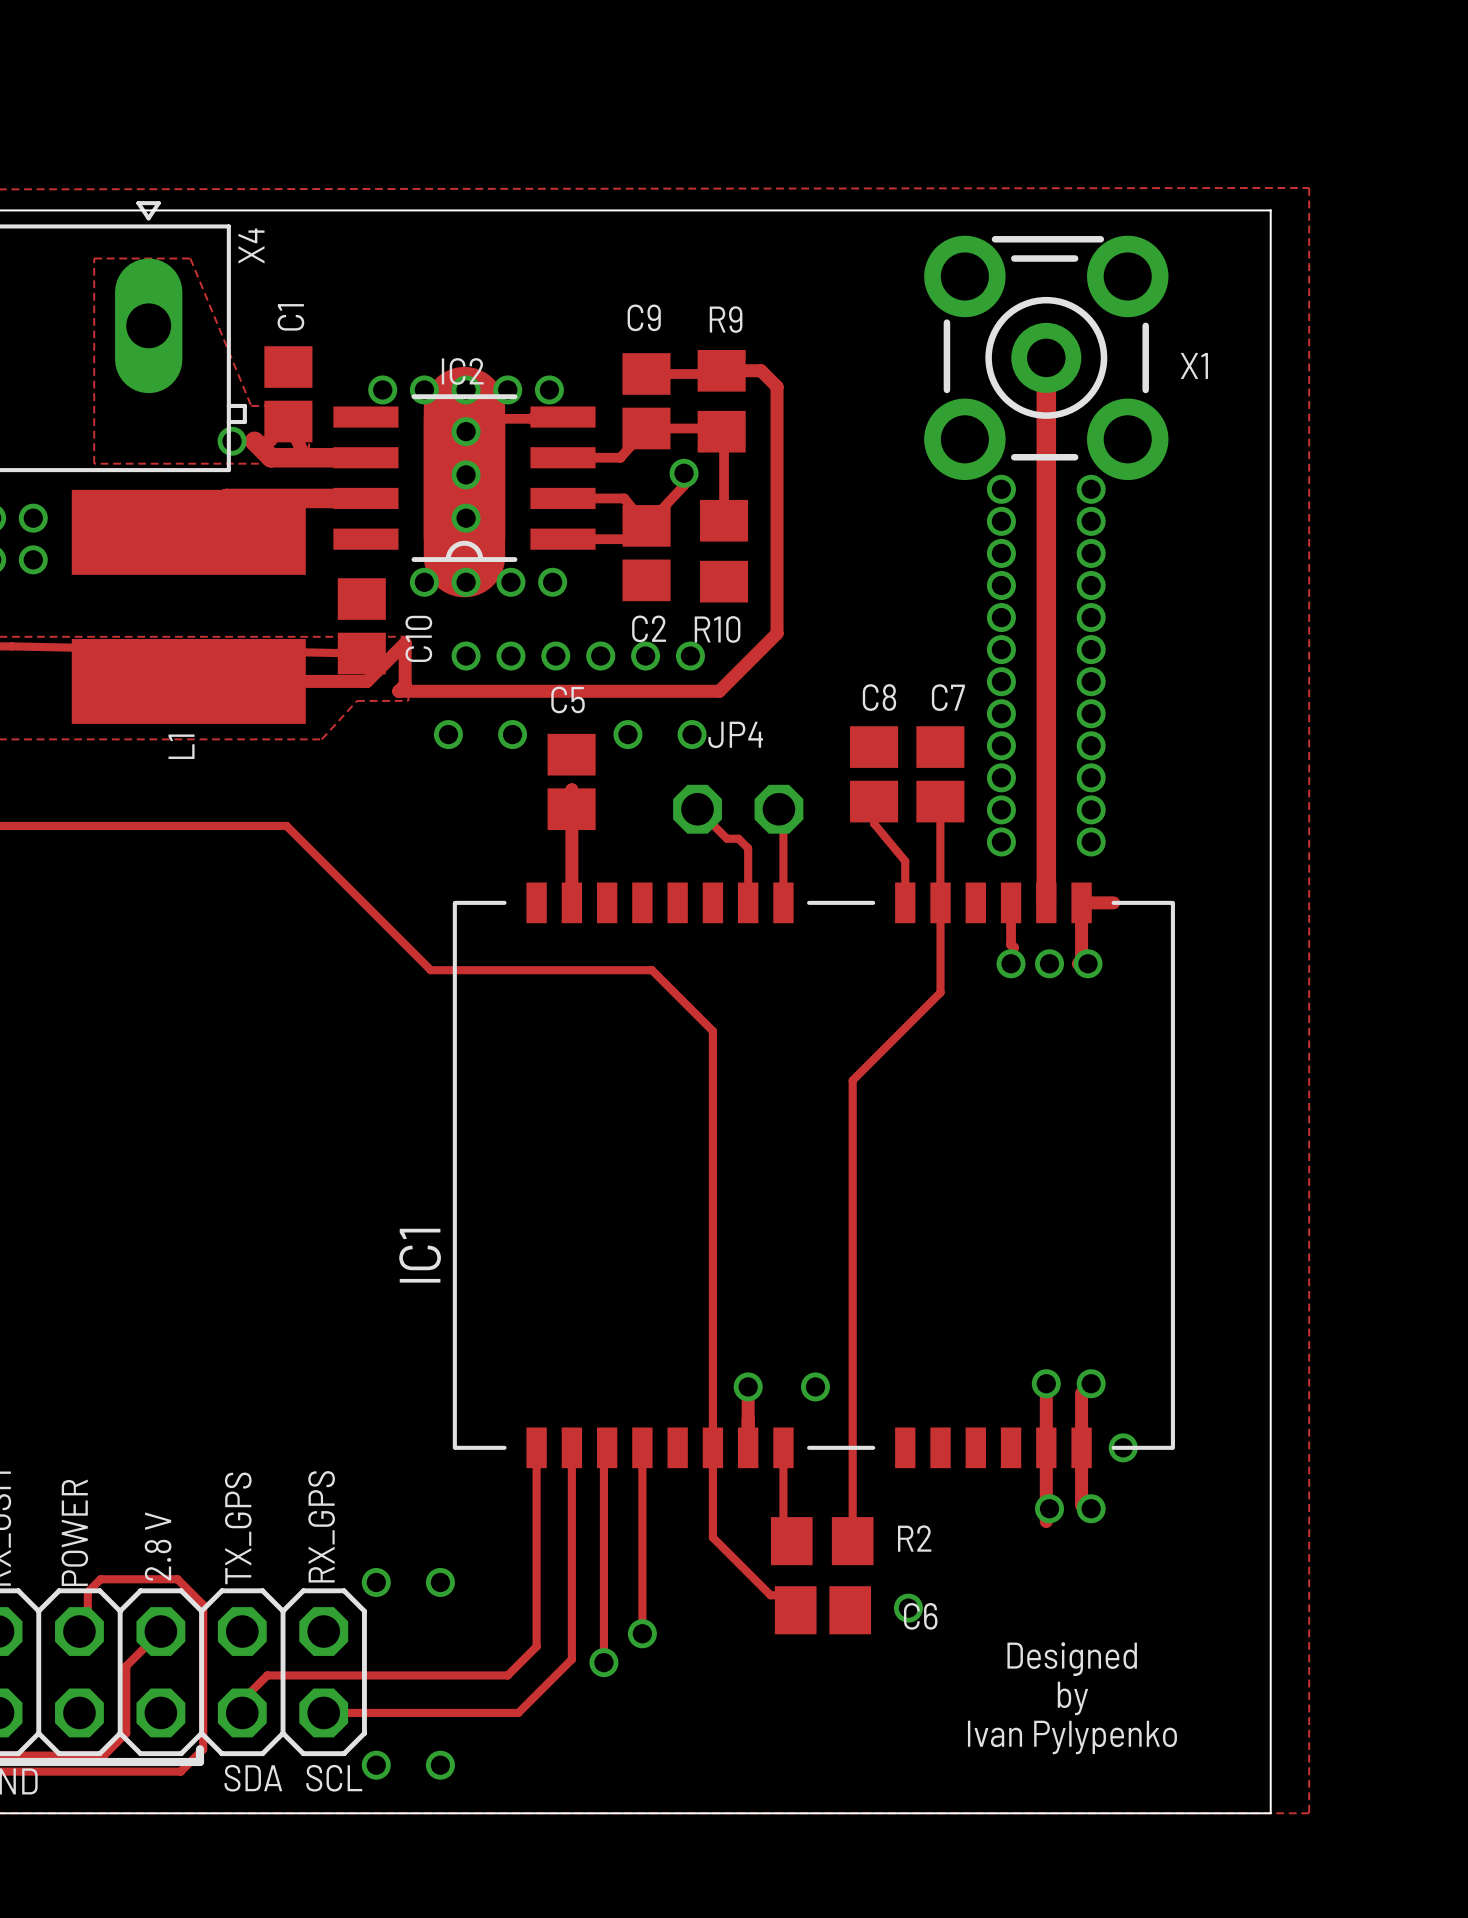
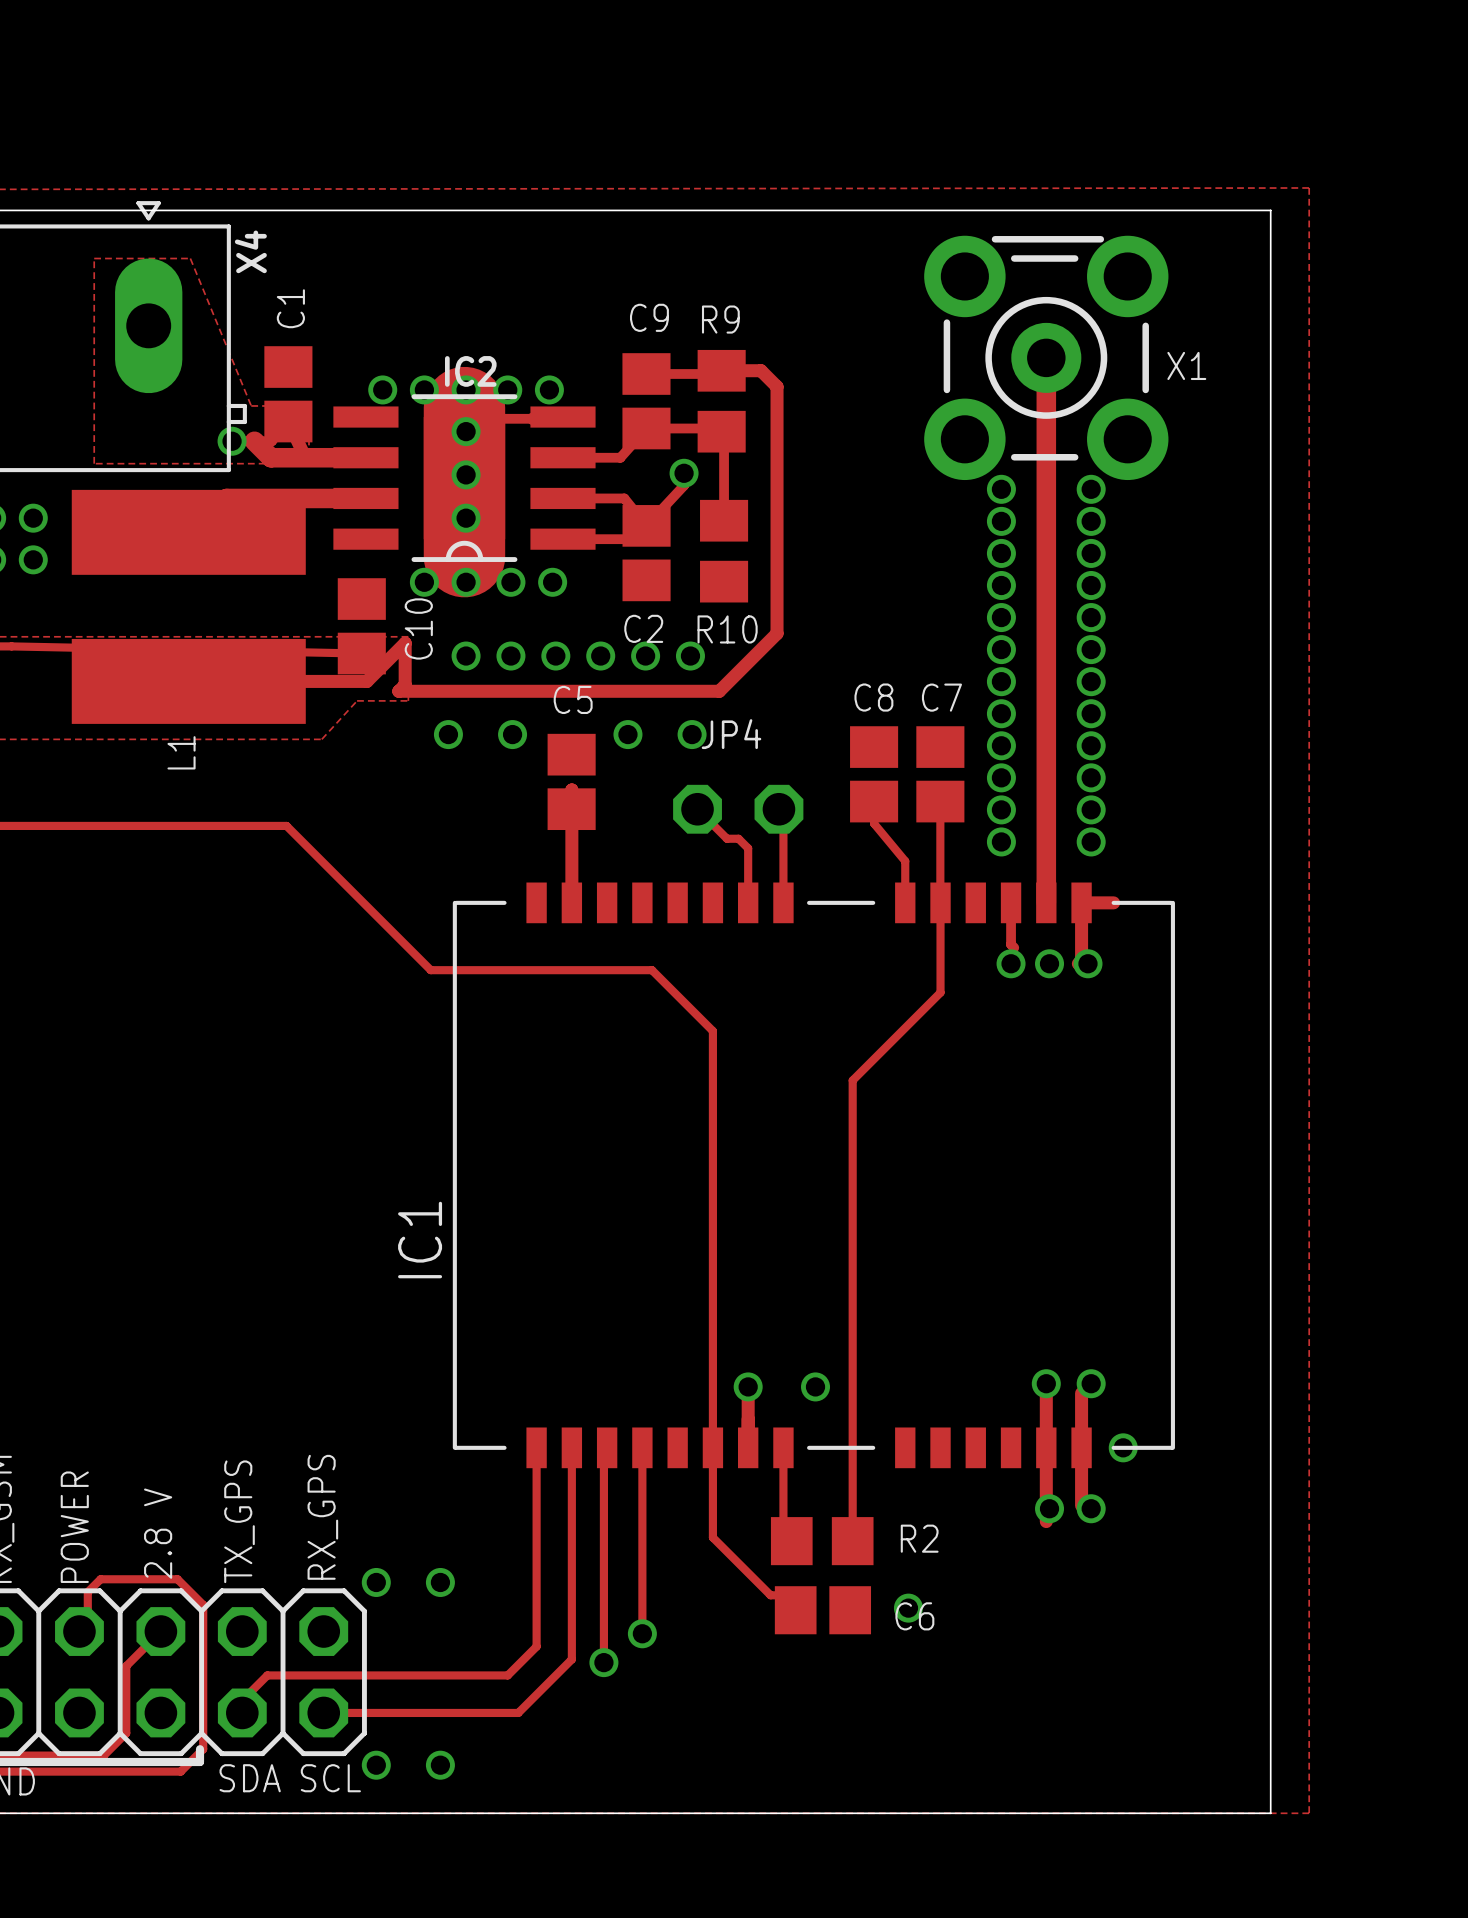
text: Designed (1072, 1659) -> none
text: by (1072, 1698) -> none
text: Ivan Pylypenko (1072, 1737) -> none

